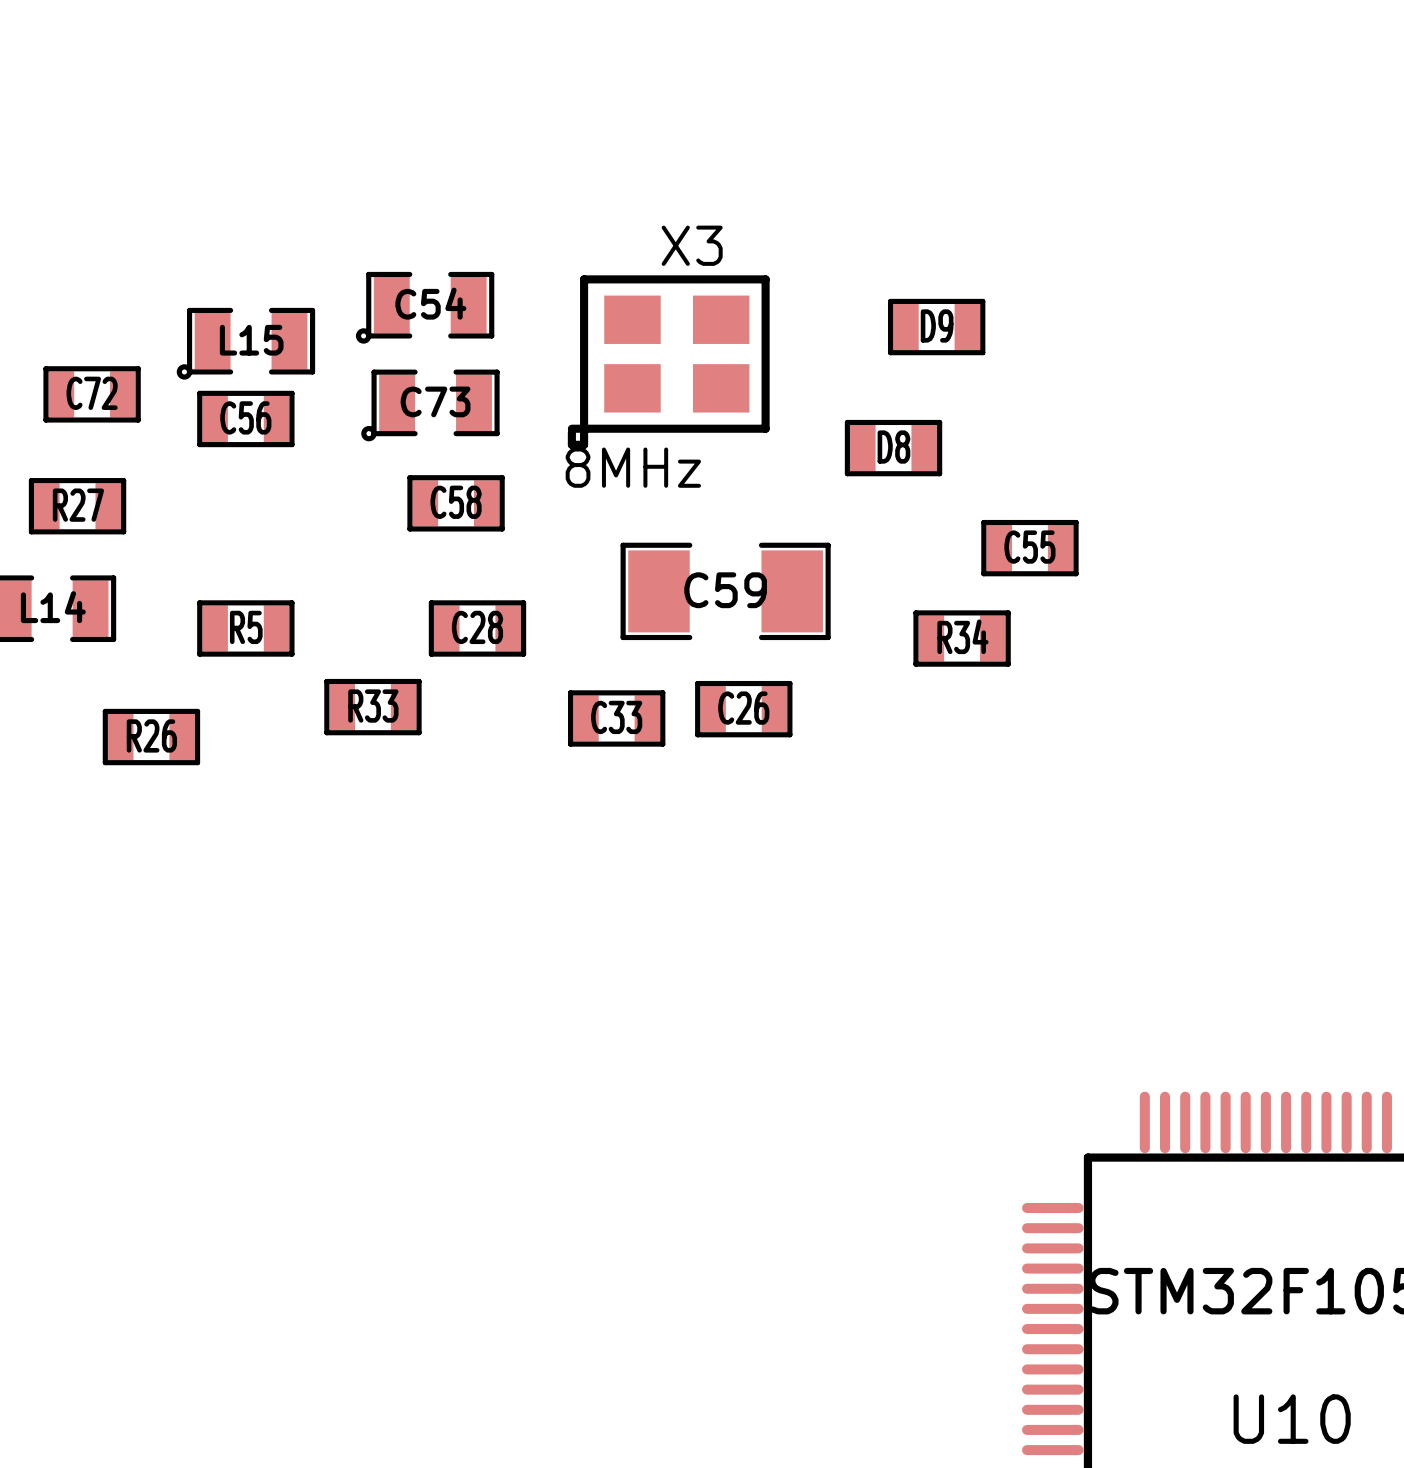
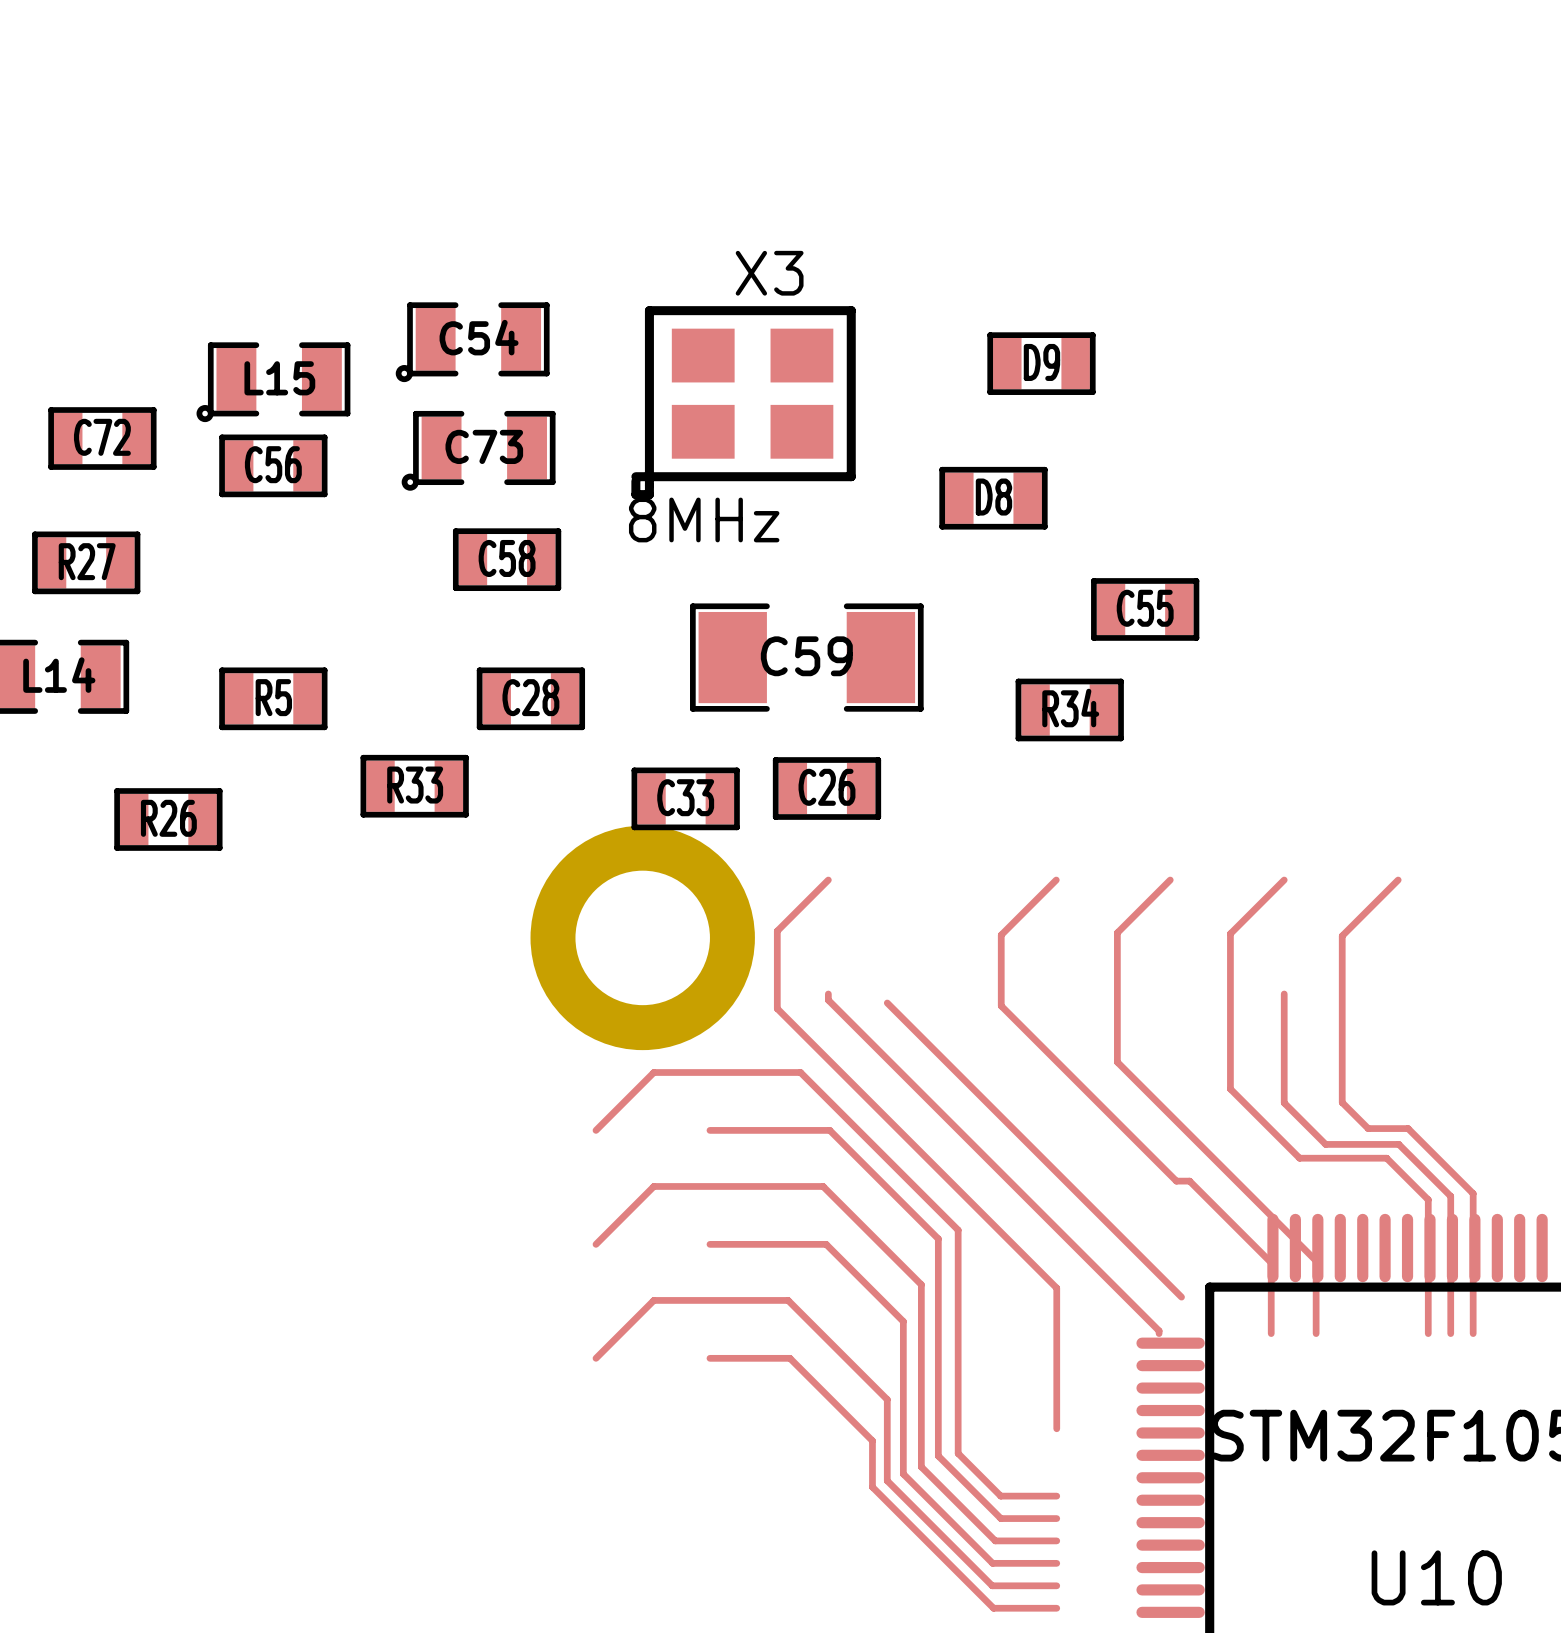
top track: none -> (828, 880) (777, 931) (777, 1008) (1056, 1288) (1056, 1428)
top track: none -> (1056, 880) (1001, 935) (1001, 1005) (1176, 1181) (1189, 1181) (1271, 1262) (1271, 1333)
top track: none -> (1170, 880) (1117, 932) (1117, 1062) (1316, 1260) (1316, 1333)
top track: none -> (1284, 880) (1230, 933) (1230, 1089) (1299, 1158) (1386, 1158) (1428, 1199) (1428, 1333)
top track: none -> (1398, 880) (1342, 935) (1342, 1102) (1368, 1128) (1408, 1128) (1473, 1193) (1473, 1333)
part: none -> (642, 937)
top track: none -> (828, 993) (828, 1000) (1159, 1330) (1159, 1333)
top track: none -> (1284, 993) (1284, 1102) (1325, 1144) (1398, 1144) (1450, 1196) (1450, 1333)
top track: none -> (887, 1002) (1181, 1297)
top track: none -> (595, 1130) (653, 1072) (800, 1072) (958, 1230) (958, 1453) (1000, 1496) (1056, 1496)
top track: none -> (709, 1130) (829, 1130) (938, 1238) (938, 1456) (1000, 1518) (1056, 1518)
top track: none -> (595, 1244) (653, 1186) (823, 1186) (921, 1284) (921, 1466) (995, 1540) (1056, 1540)
top track: none -> (709, 1244) (826, 1244) (903, 1321) (903, 1474) (992, 1563) (1056, 1563)
top track: none -> (595, 1358) (653, 1300) (788, 1300) (887, 1399) (887, 1480) (992, 1585) (1056, 1585)
top track: none -> (709, 1358) (789, 1358) (872, 1440) (872, 1487) (993, 1608) (1056, 1608)

